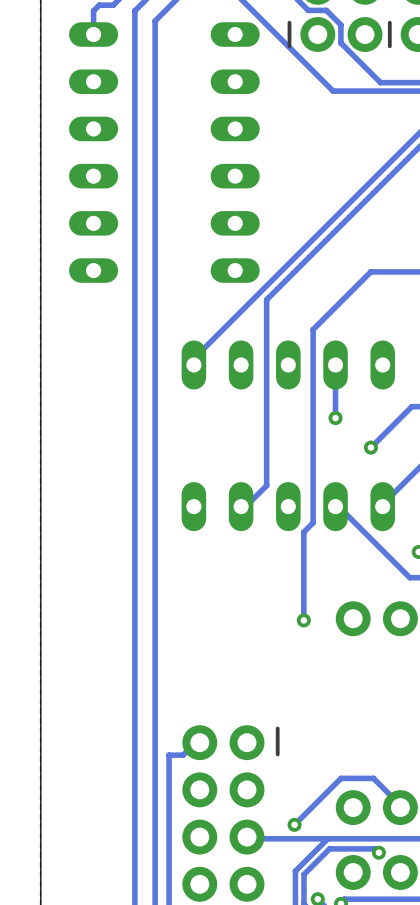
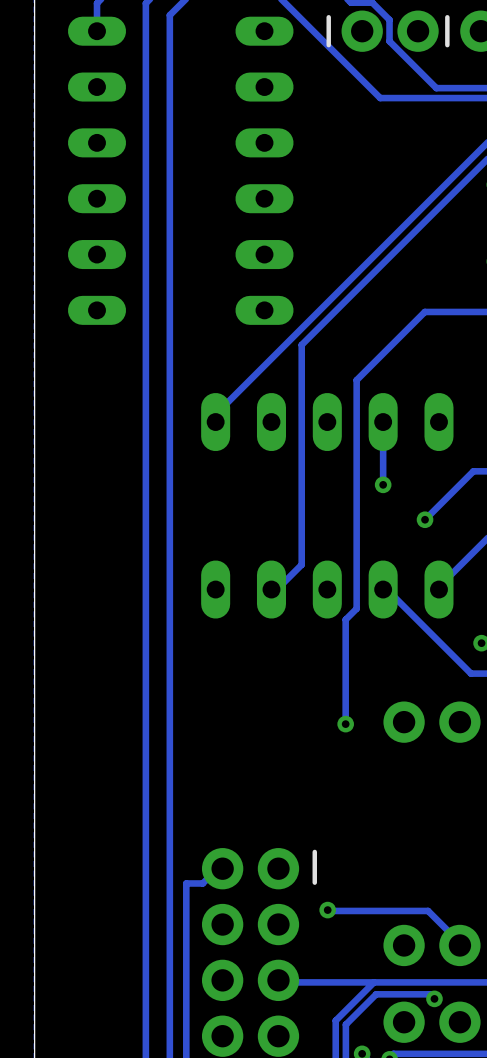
track: (341, 778) (294, 824) -> (389, 910) (327, 910)
via position: (294, 824) -> (327, 910)

